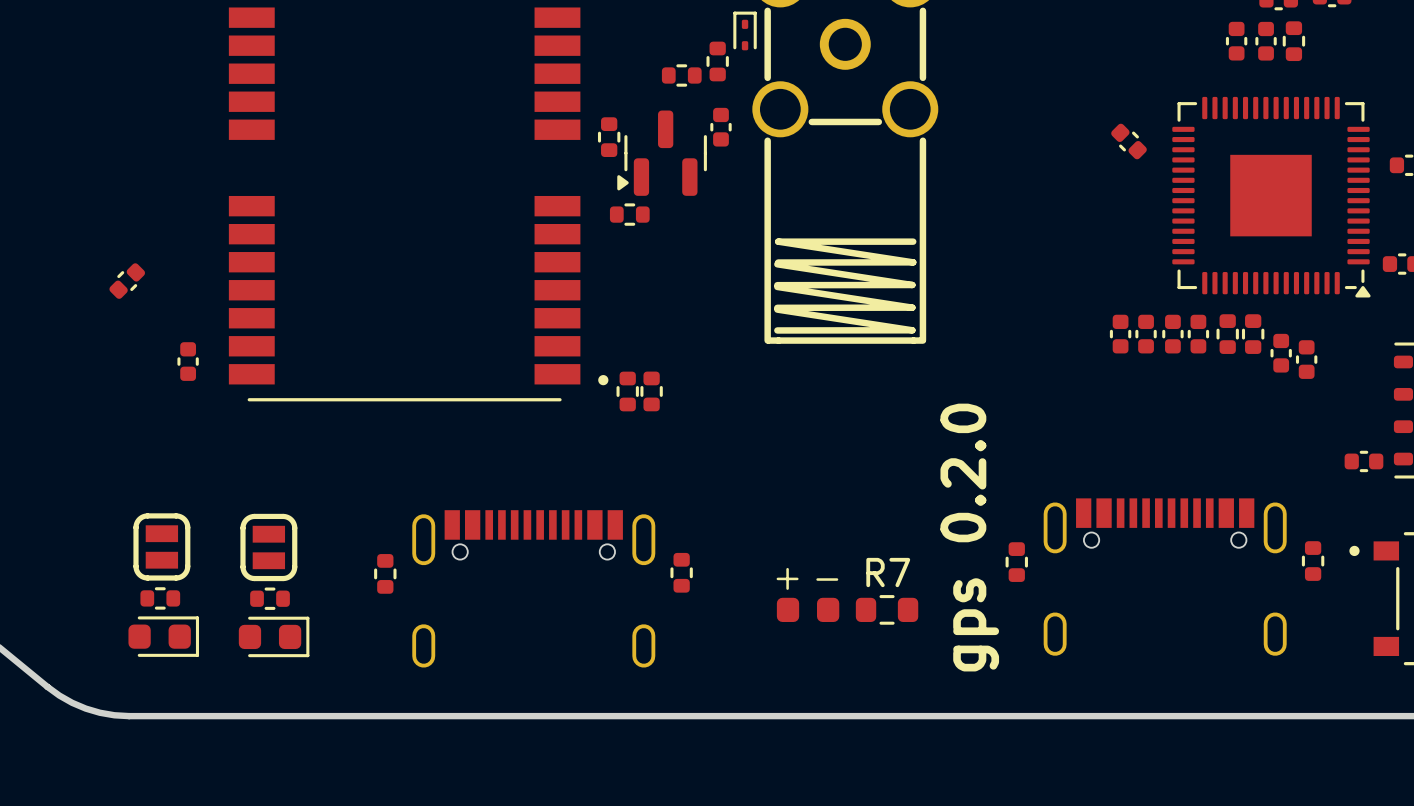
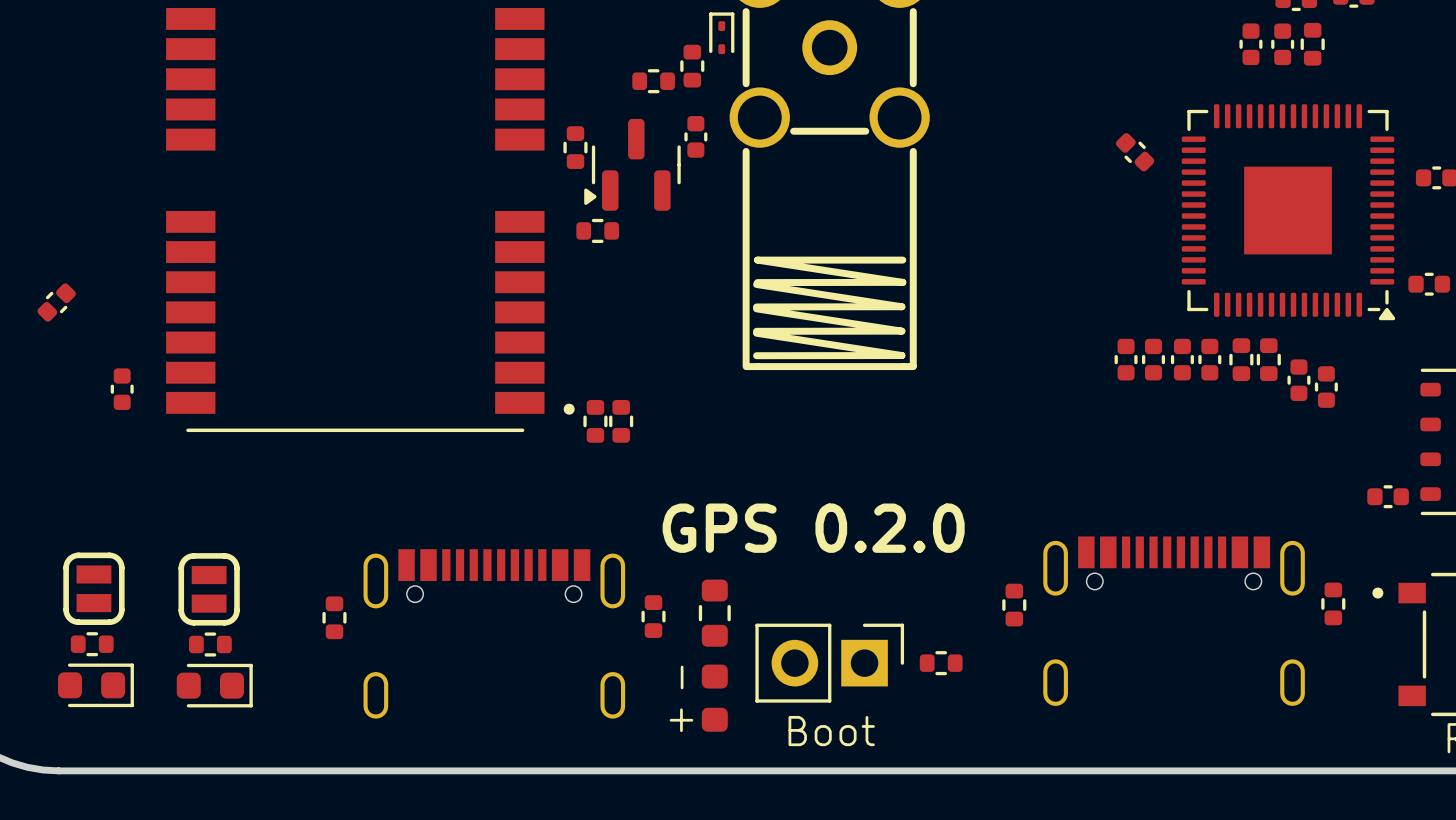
text: gps 0.2.0 (969, 537) -> GPS 0.2.0 (813, 528)
part: none -> (714, 613)
part rotation: 0° (808, 609) -> 90° counterclockwise (714, 698)
part position: (808, 609) -> (714, 698)
R7: (887, 609) -> none
part: none -> (829, 663)
part: none -> (941, 663)
text: none -> Boot (831, 731)

